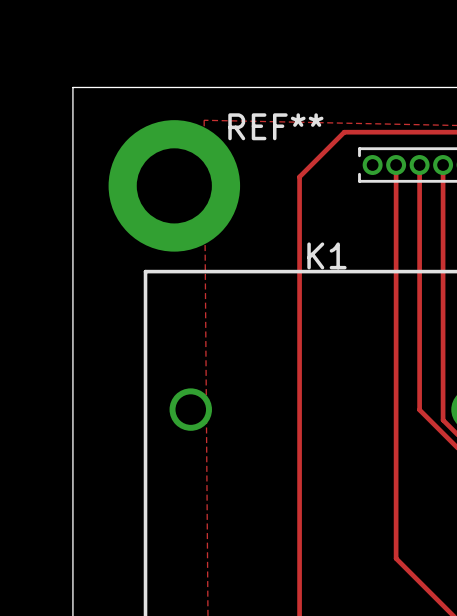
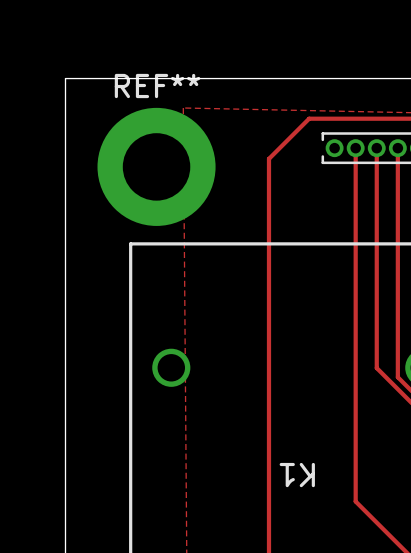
REF** name position: REF** (275, 126) -> REF** (157, 86)
K1 name rotation: 0° (326, 255) -> 180° (297, 475)
K1 name position: K1 (326, 255) -> K1 (297, 475)

